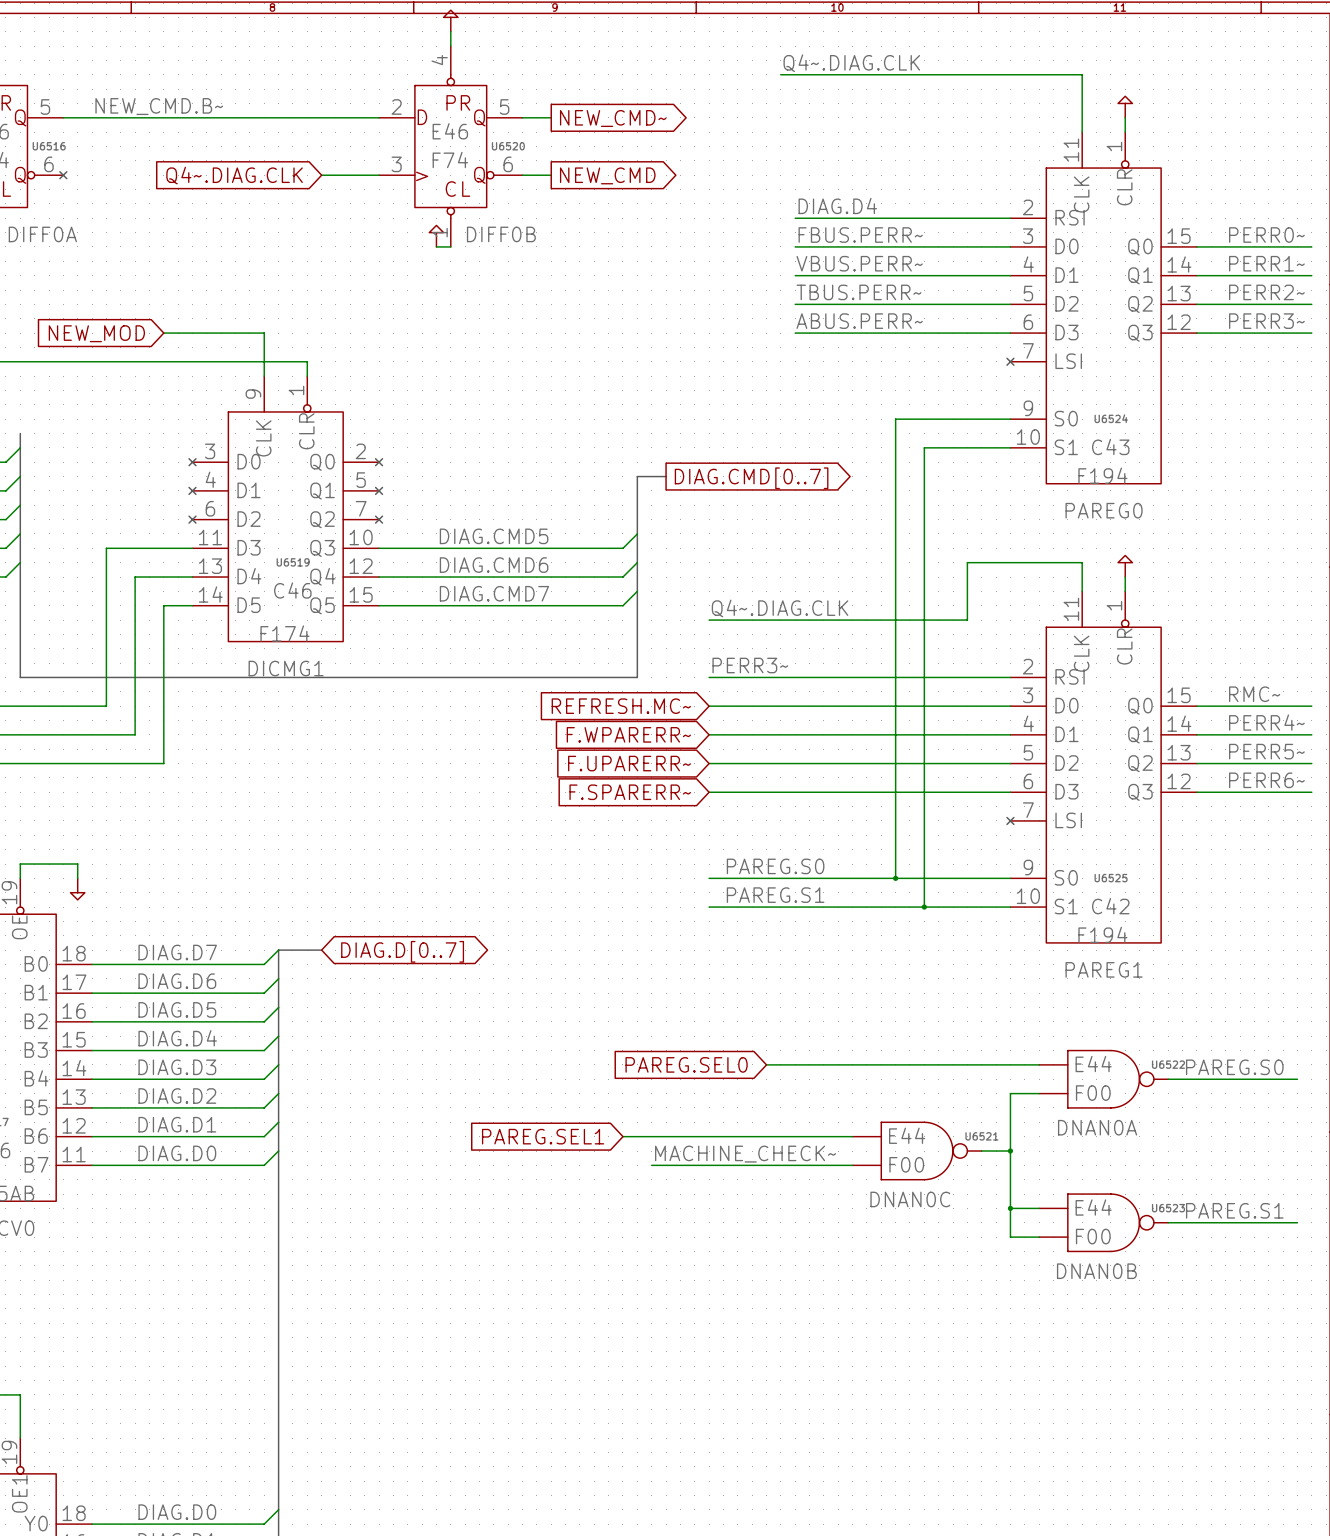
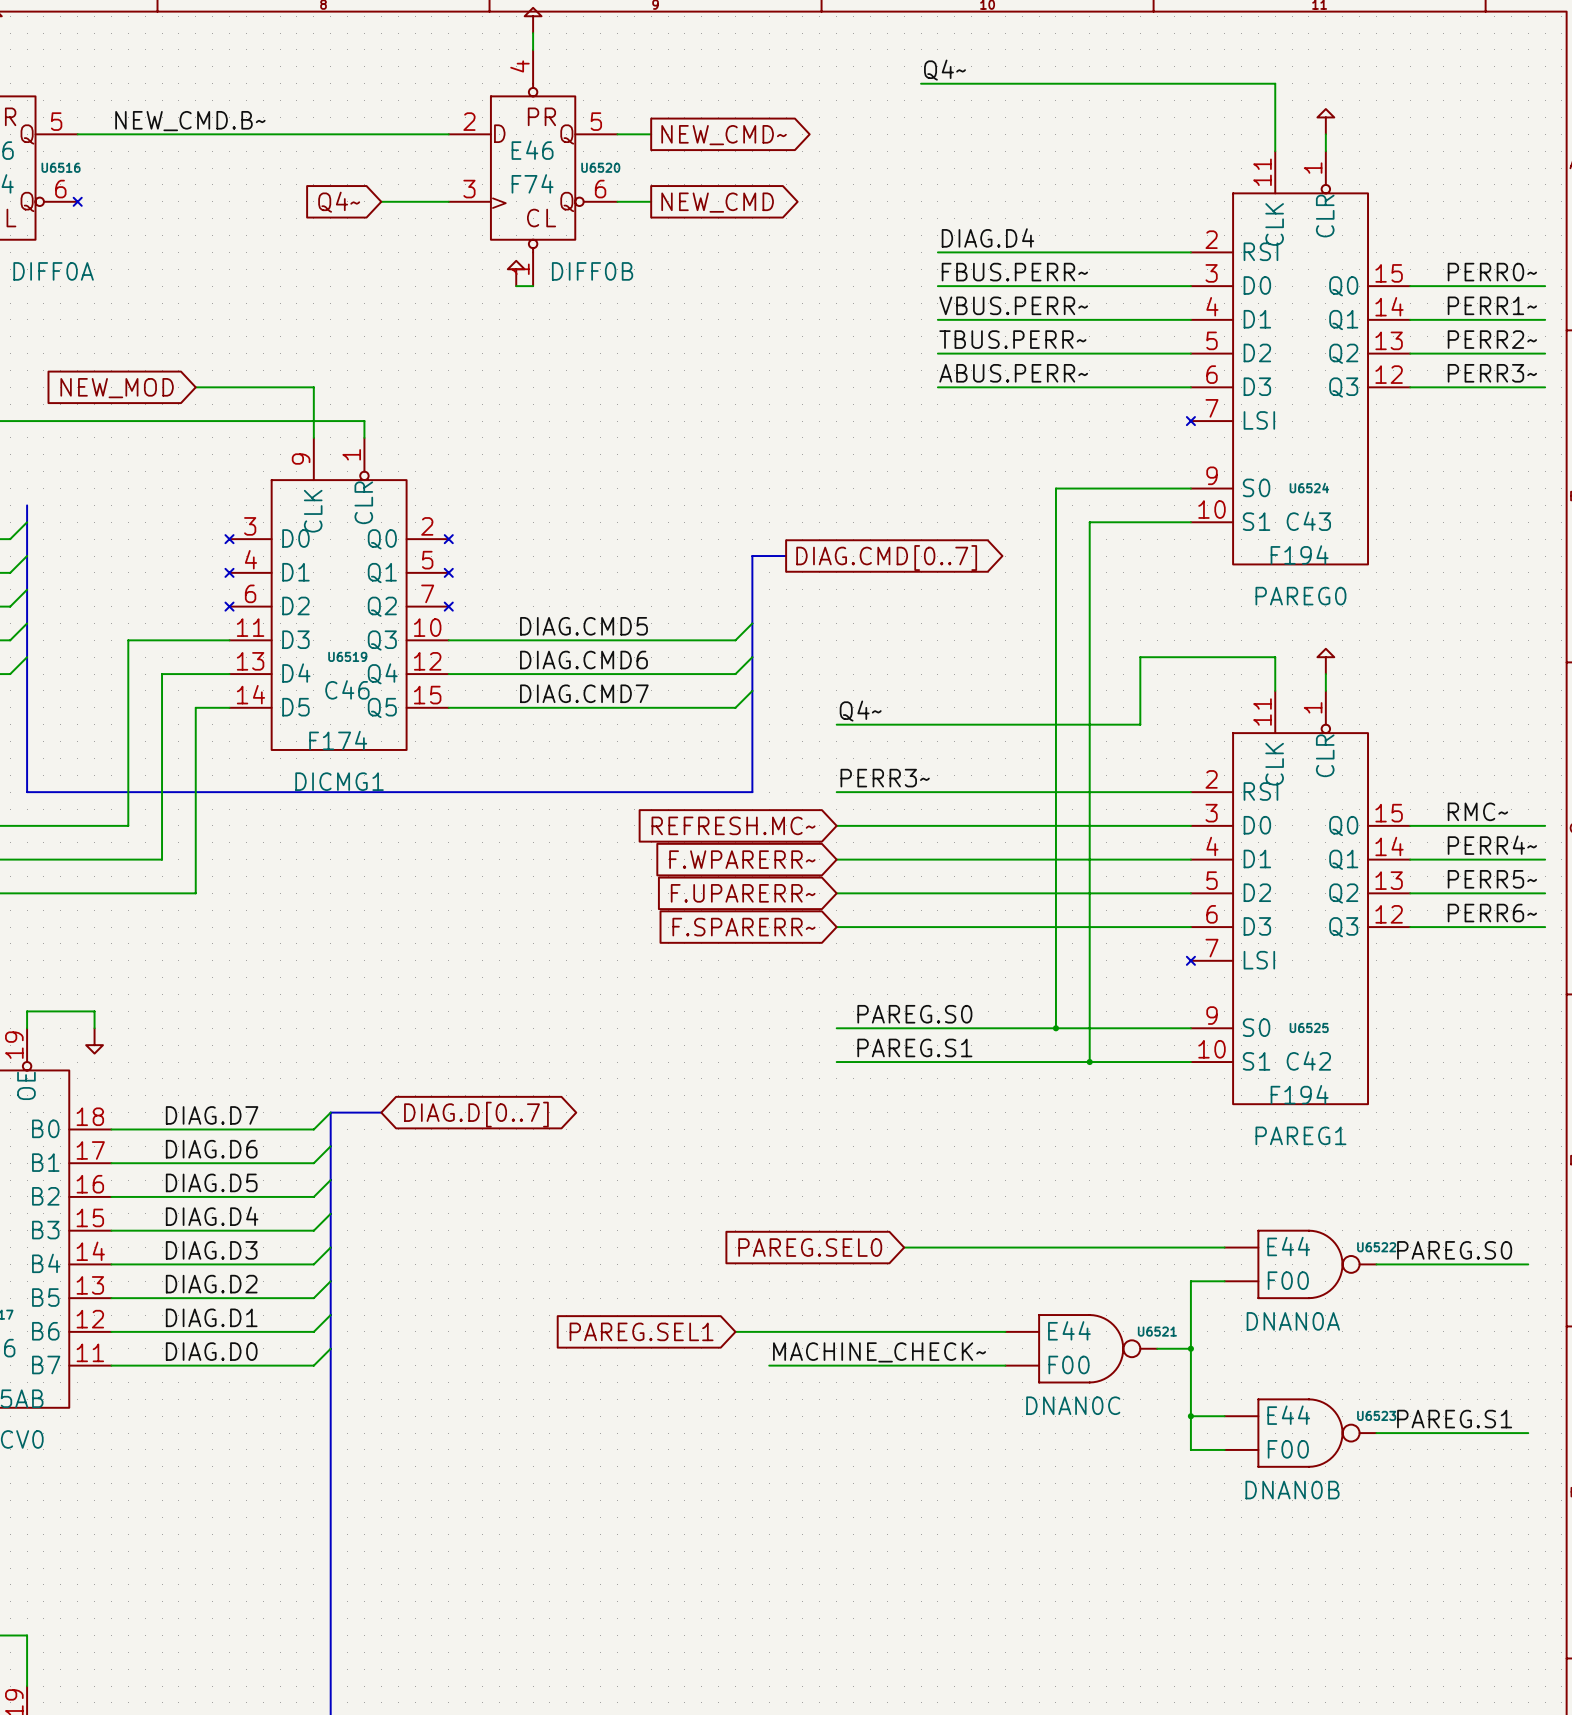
label: Q4~.DIAG.CLK (851, 63) -> Q4~ (945, 70)
global label: Q4~.DIAG.CLK (234, 175) -> Q4~ (339, 202)
label: Q4~.DIAG.CLK (780, 608) -> Q4~ (860, 711)

